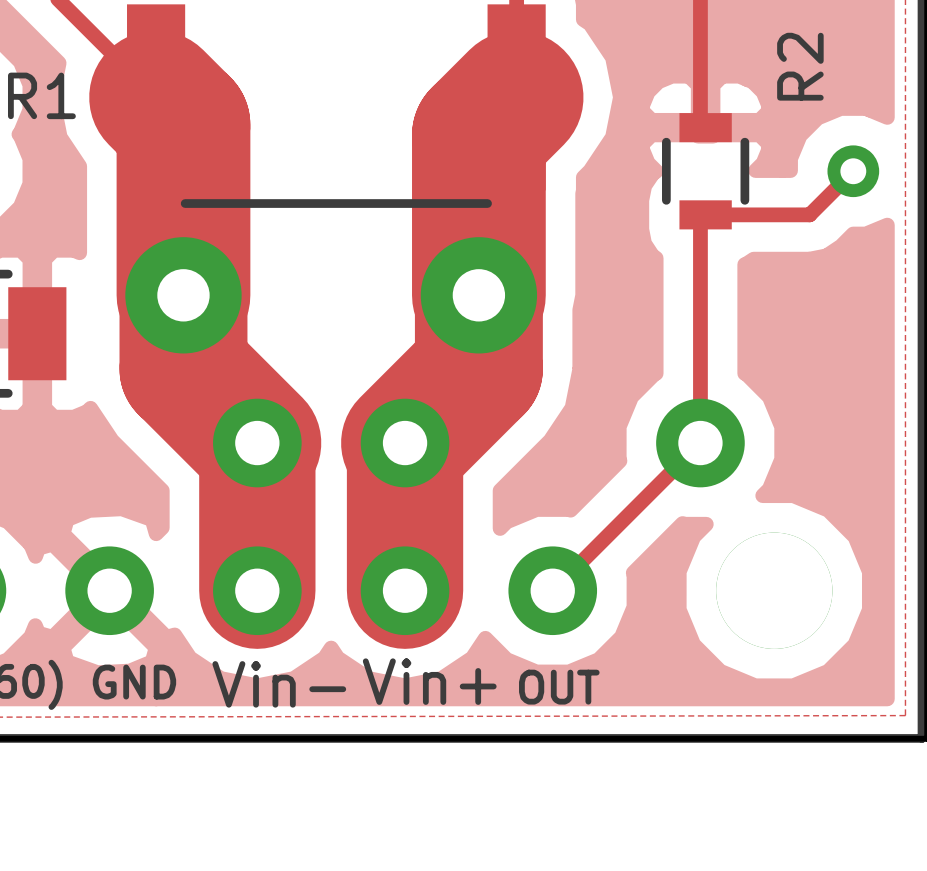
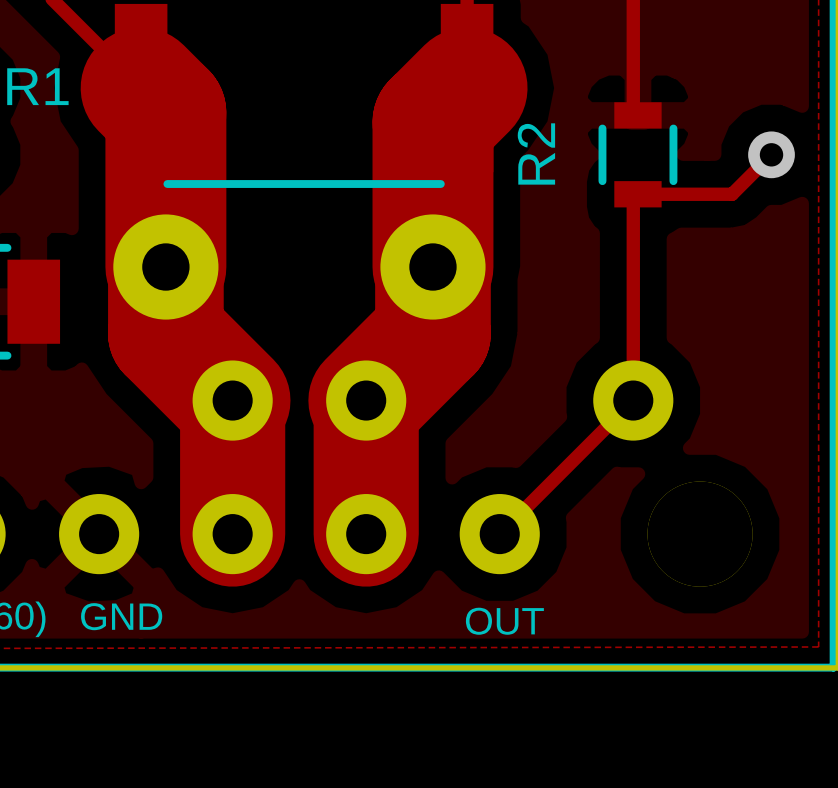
R2 name position: R2 (800, 66) -> R2 (536, 153)
text: Vin+ (429, 681) -> none
text: Vin- (279, 684) -> none

